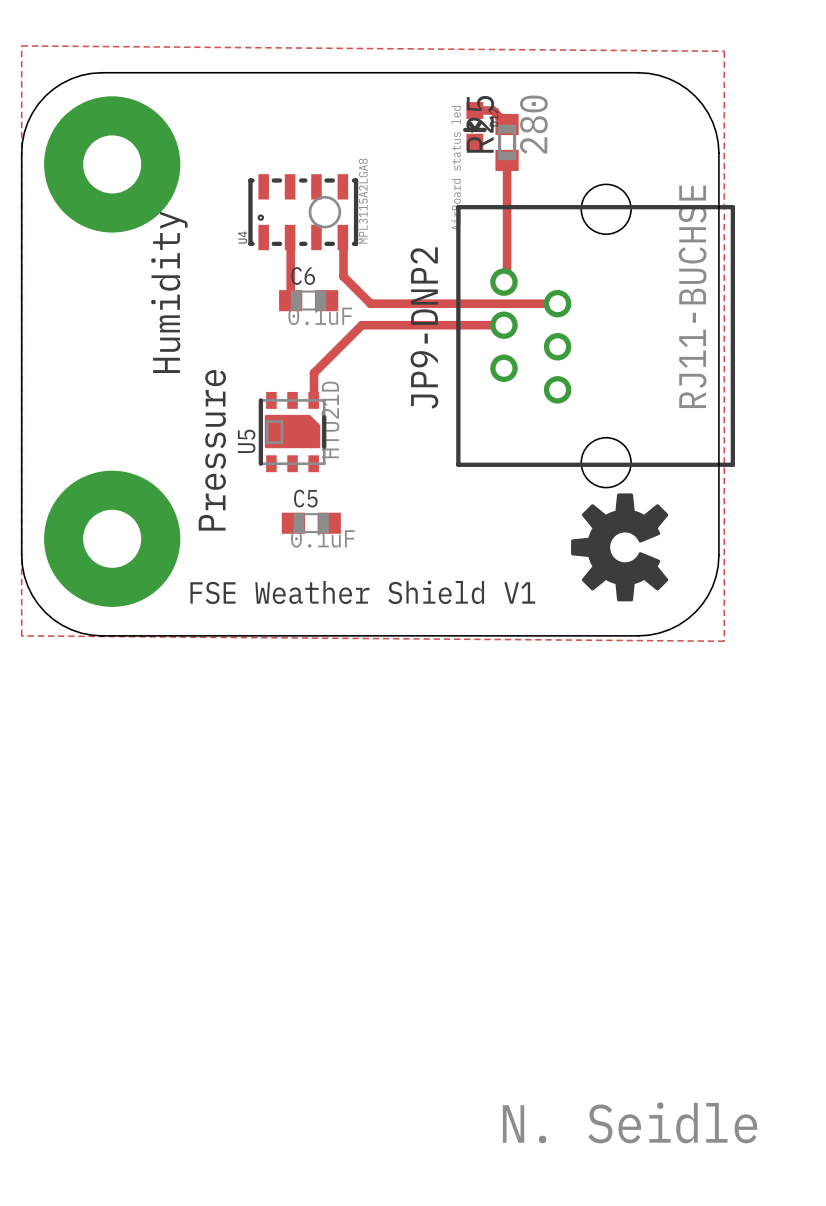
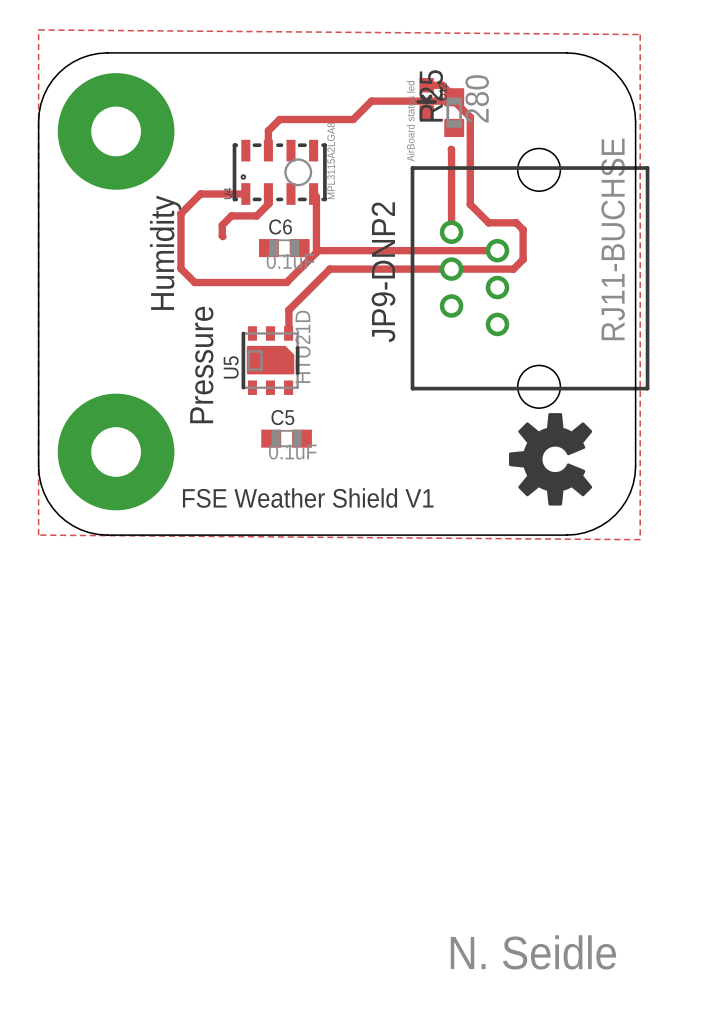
track: (507, 160) (507, 279) (503, 282) -> (451, 149) (451, 232)
track: none -> (268, 150) (268, 130) (279, 119) (353, 119) (371, 101) (454, 101) (470, 117) (470, 204) (488, 222) (516, 222) (523, 229) (523, 259) (513, 269) (451, 269)
track: none -> (245, 194) (200, 194) (180, 213) (180, 268) (194, 282) (286, 282) (318, 250) (337, 250)
track: (343, 238) (343, 276) (370, 303) -> (314, 194) (316, 196) (316, 252)
track: (290, 248) (290, 300) -> (268, 203) (256, 215) (231, 215) (222, 225) (223, 236)

